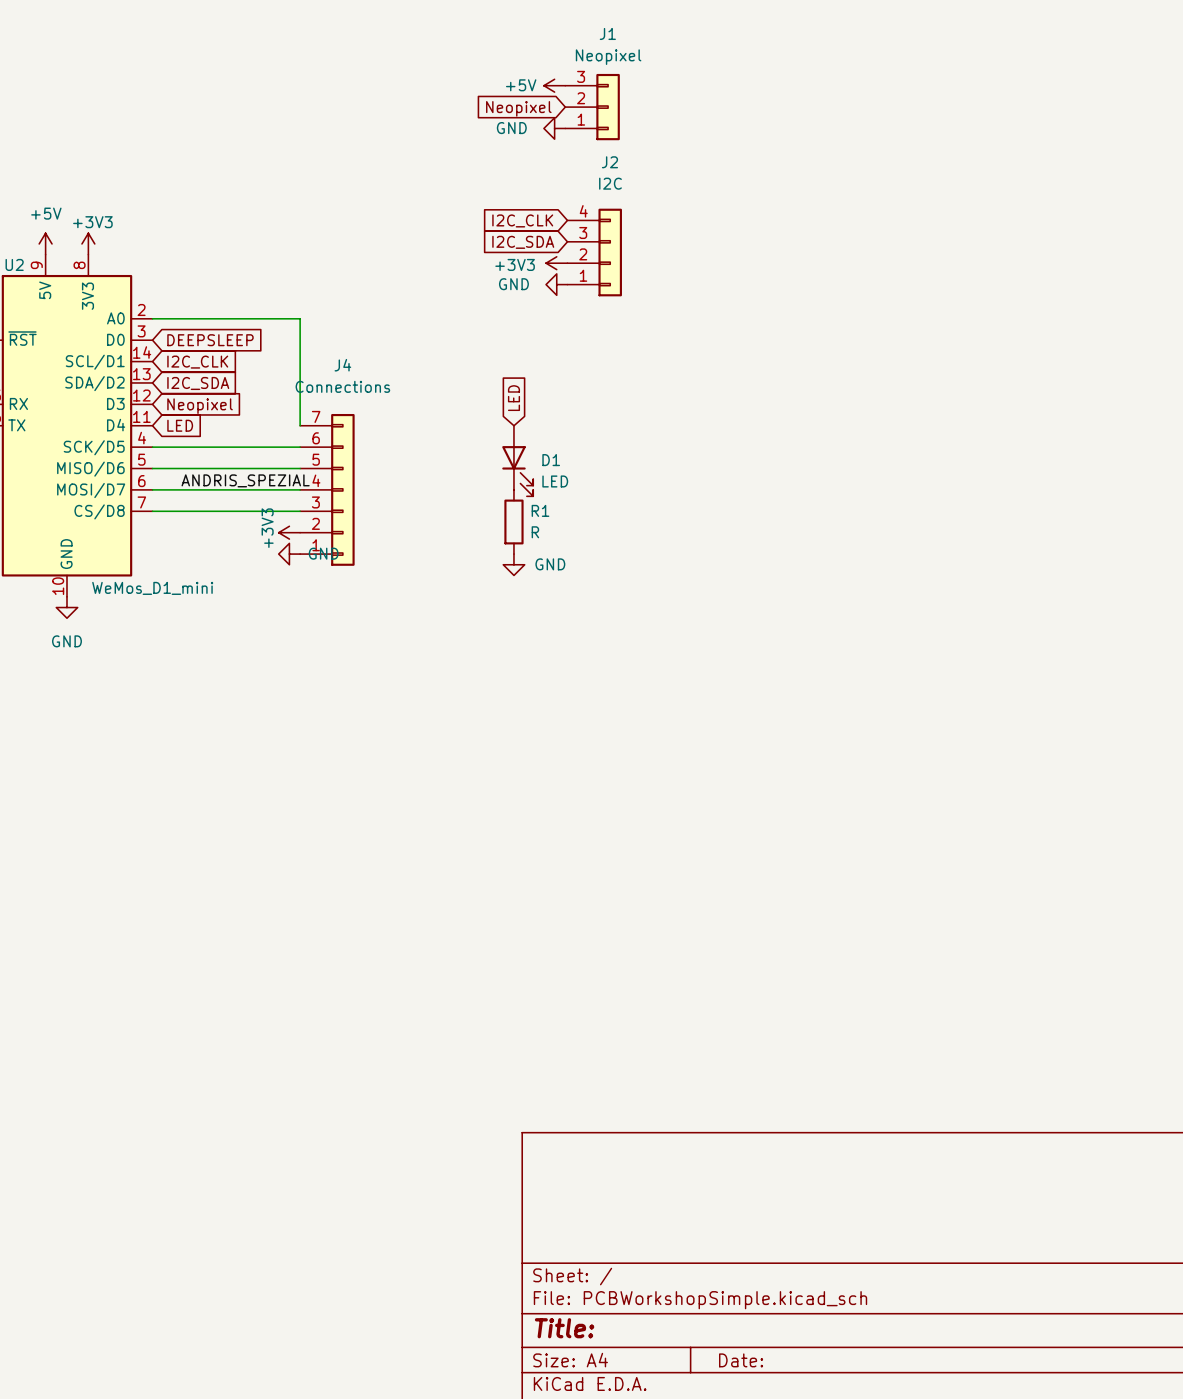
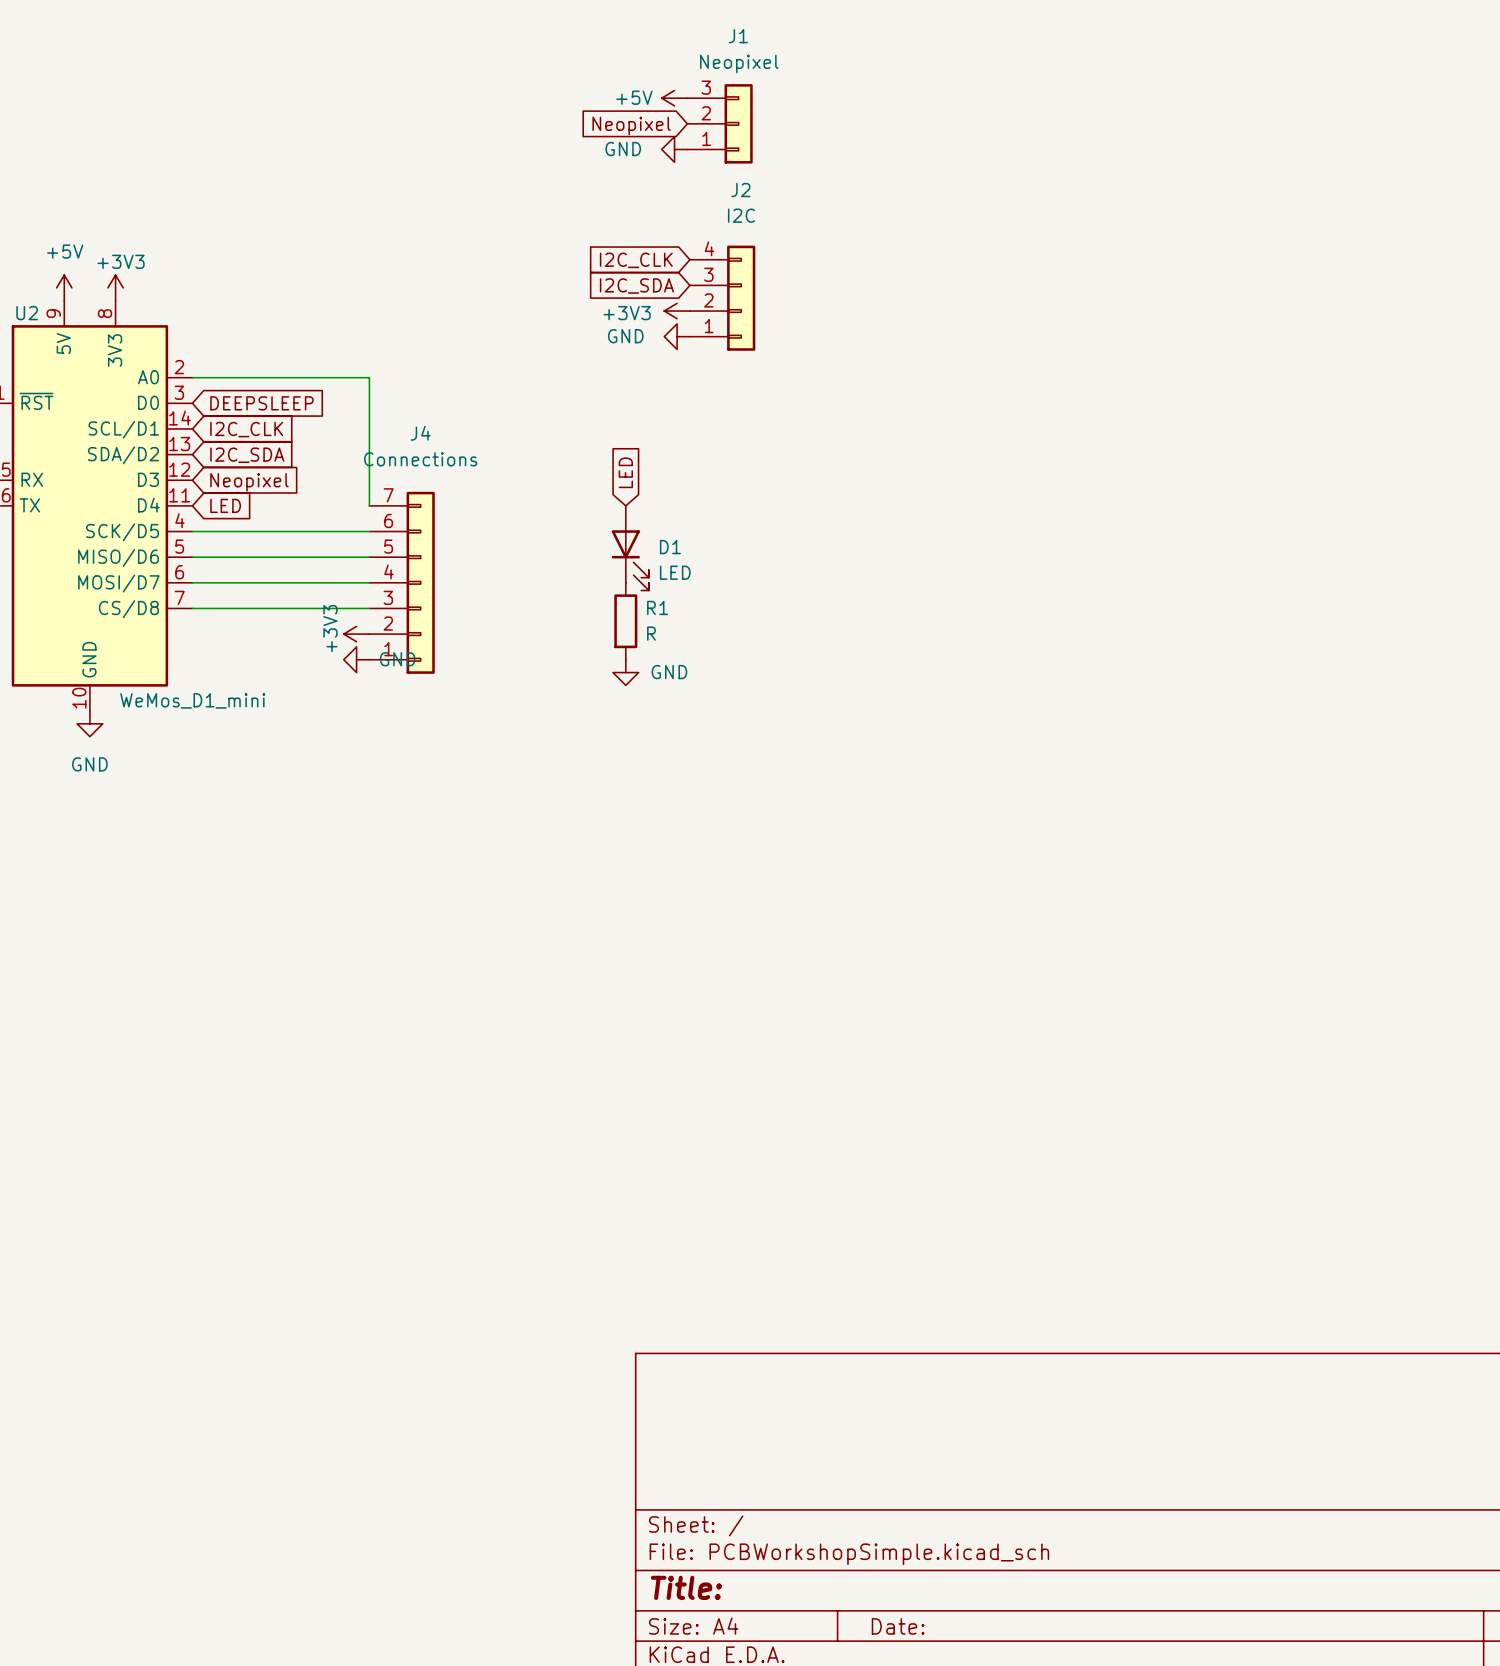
label: ANDRIS_SPEZIAL (245, 480) -> none

